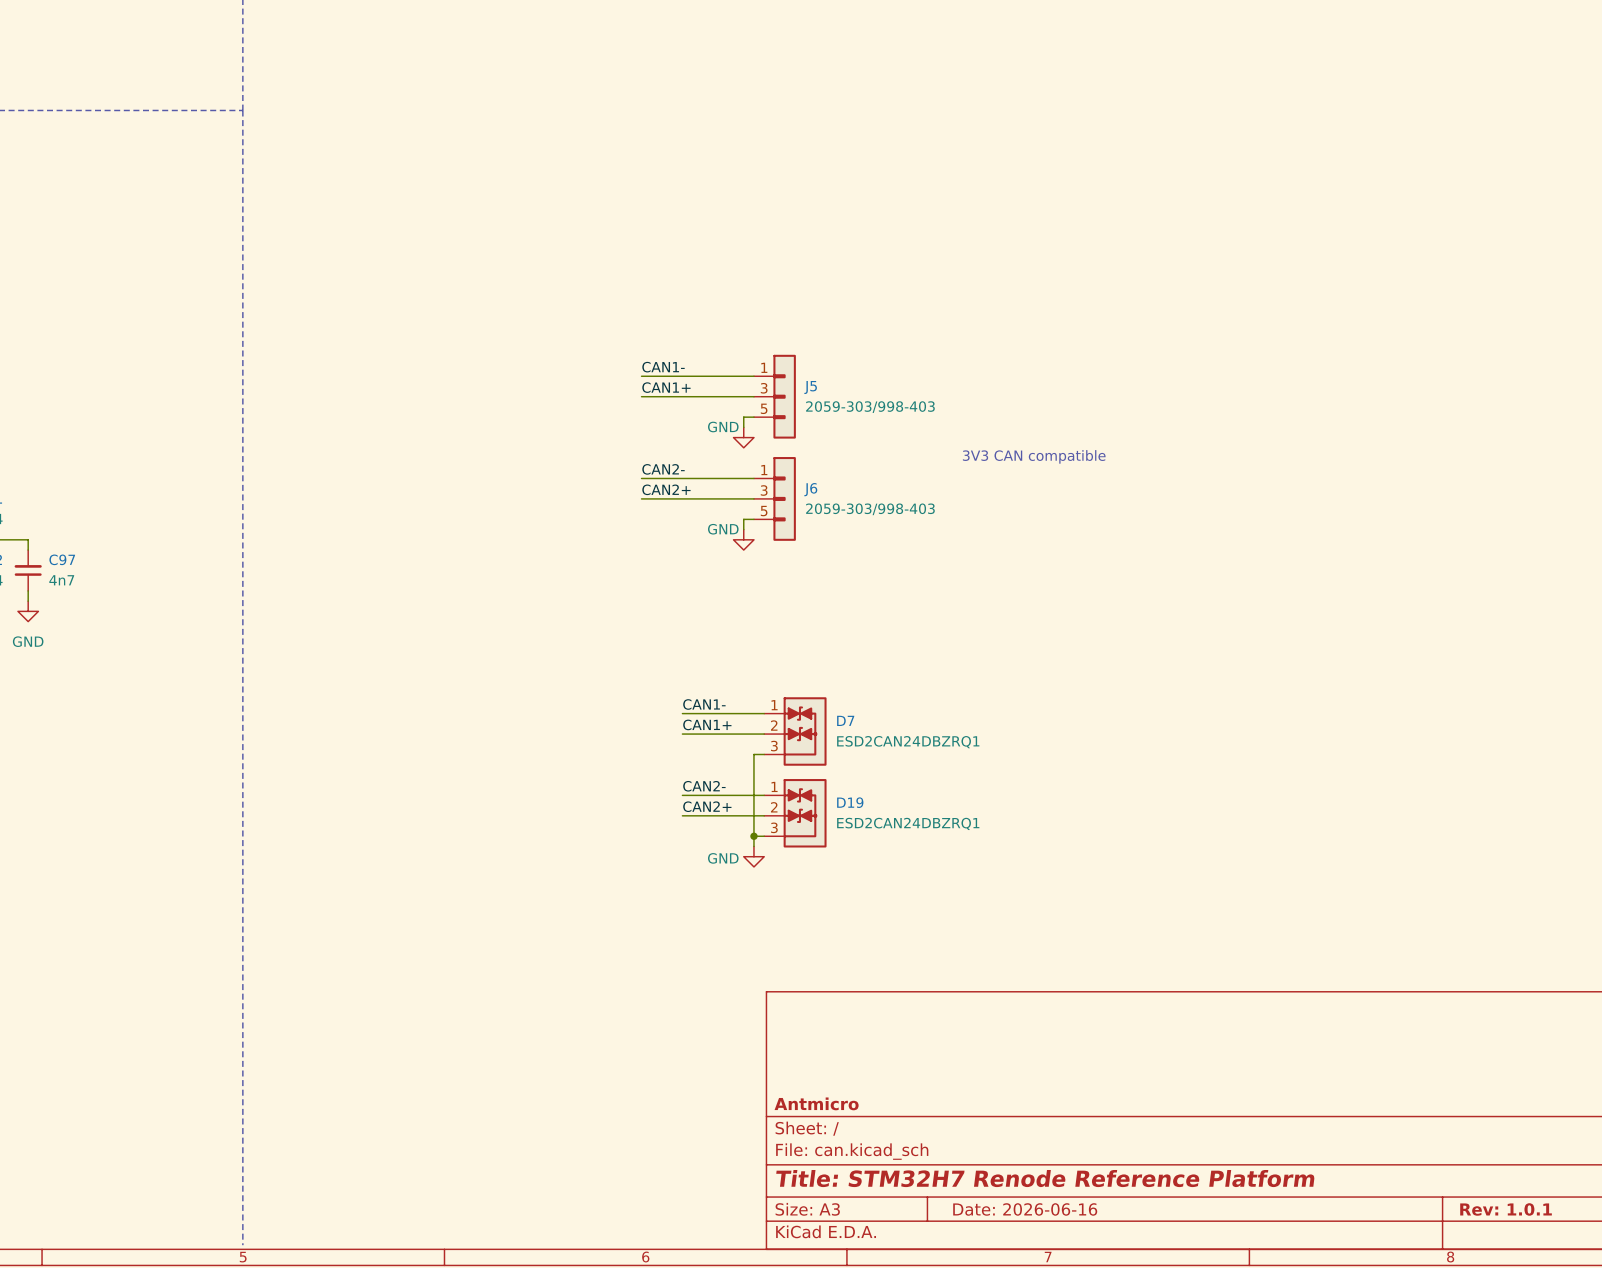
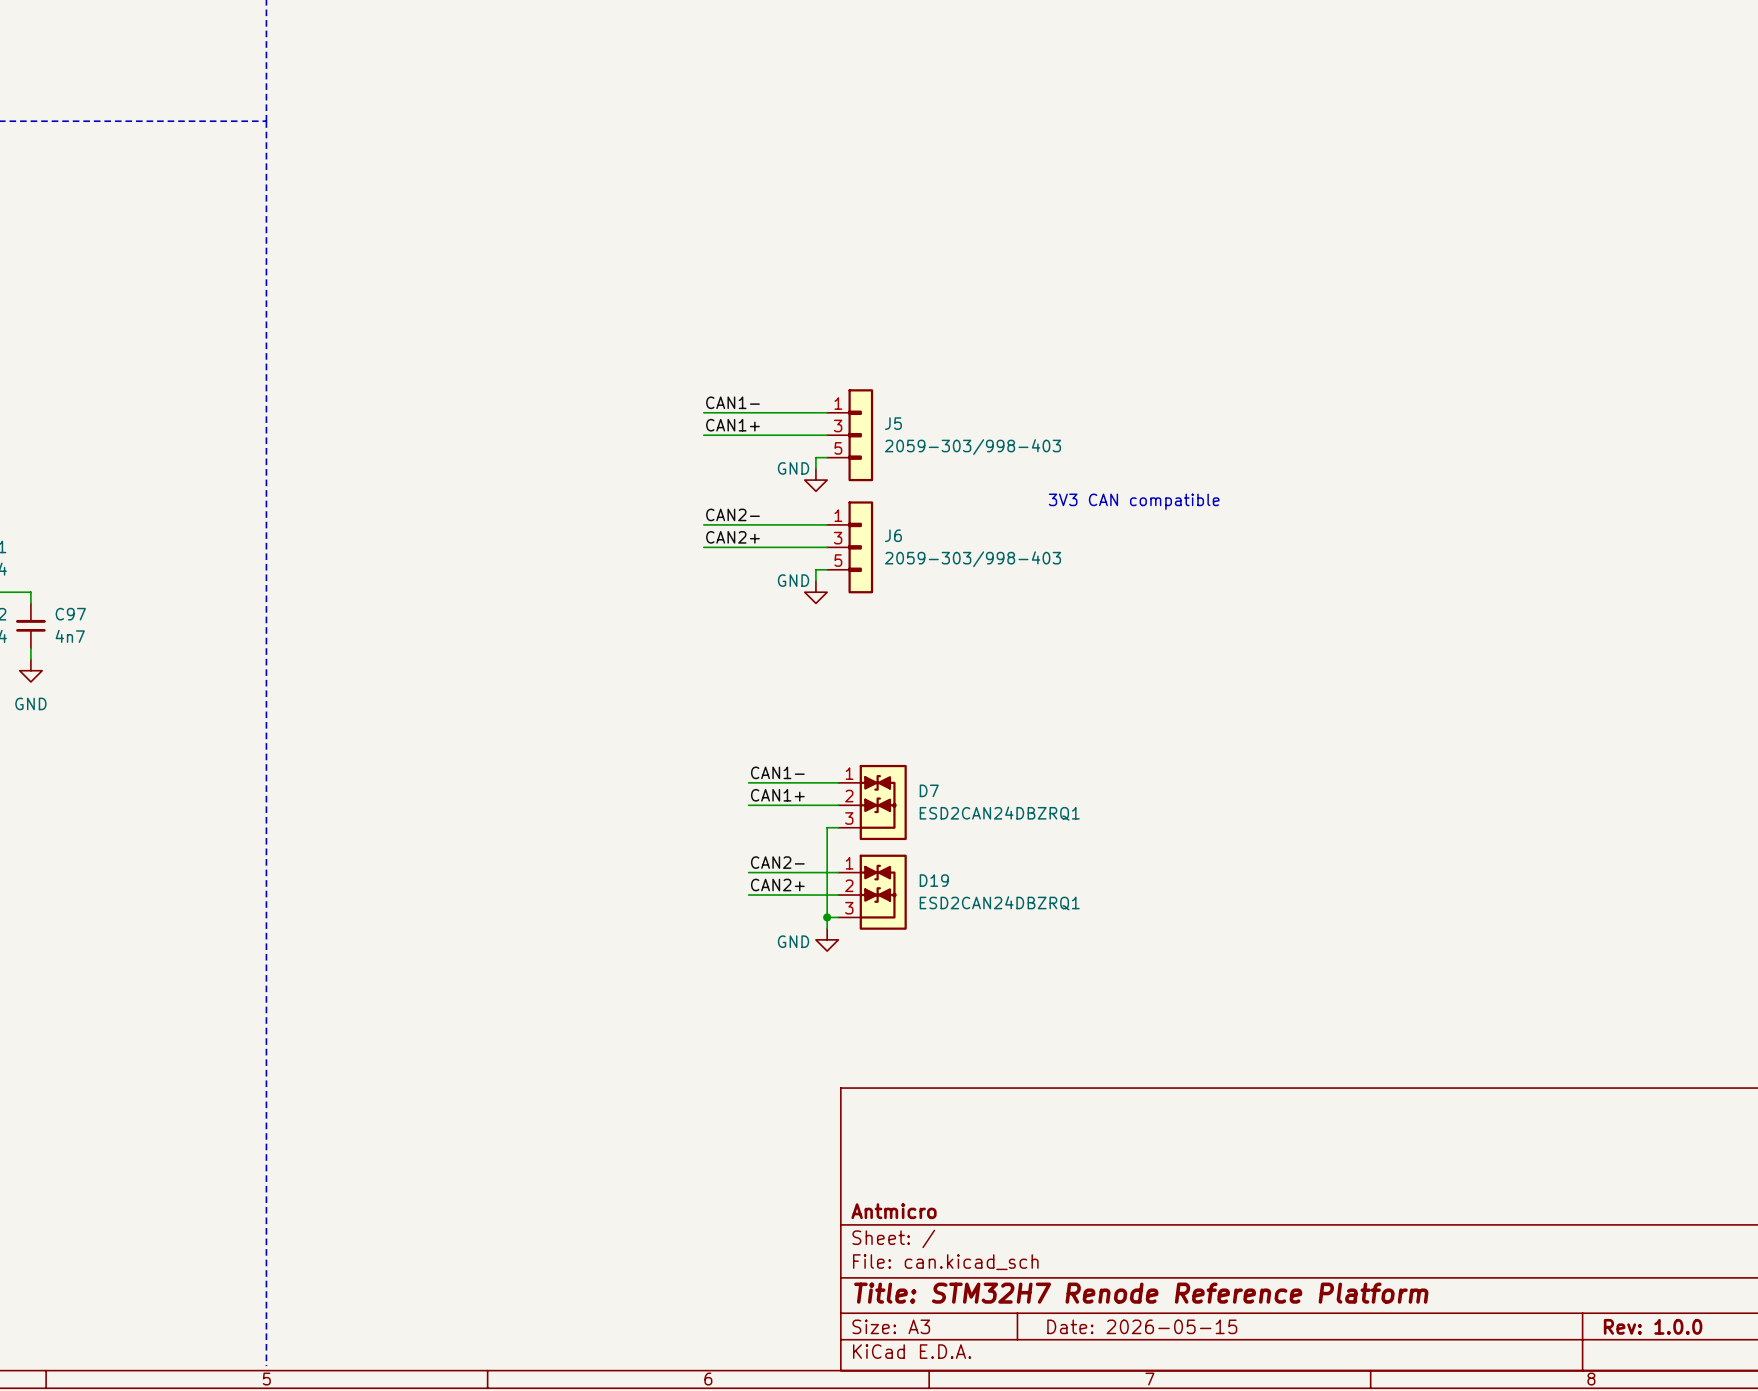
title block: Date: 2026-06-16 (1025, 1209) -> Date: 2026-05-15 (1142, 1326)
title block: Rev: 1.0.1 (1506, 1209) -> Rev: 1.0.0 (1653, 1326)

